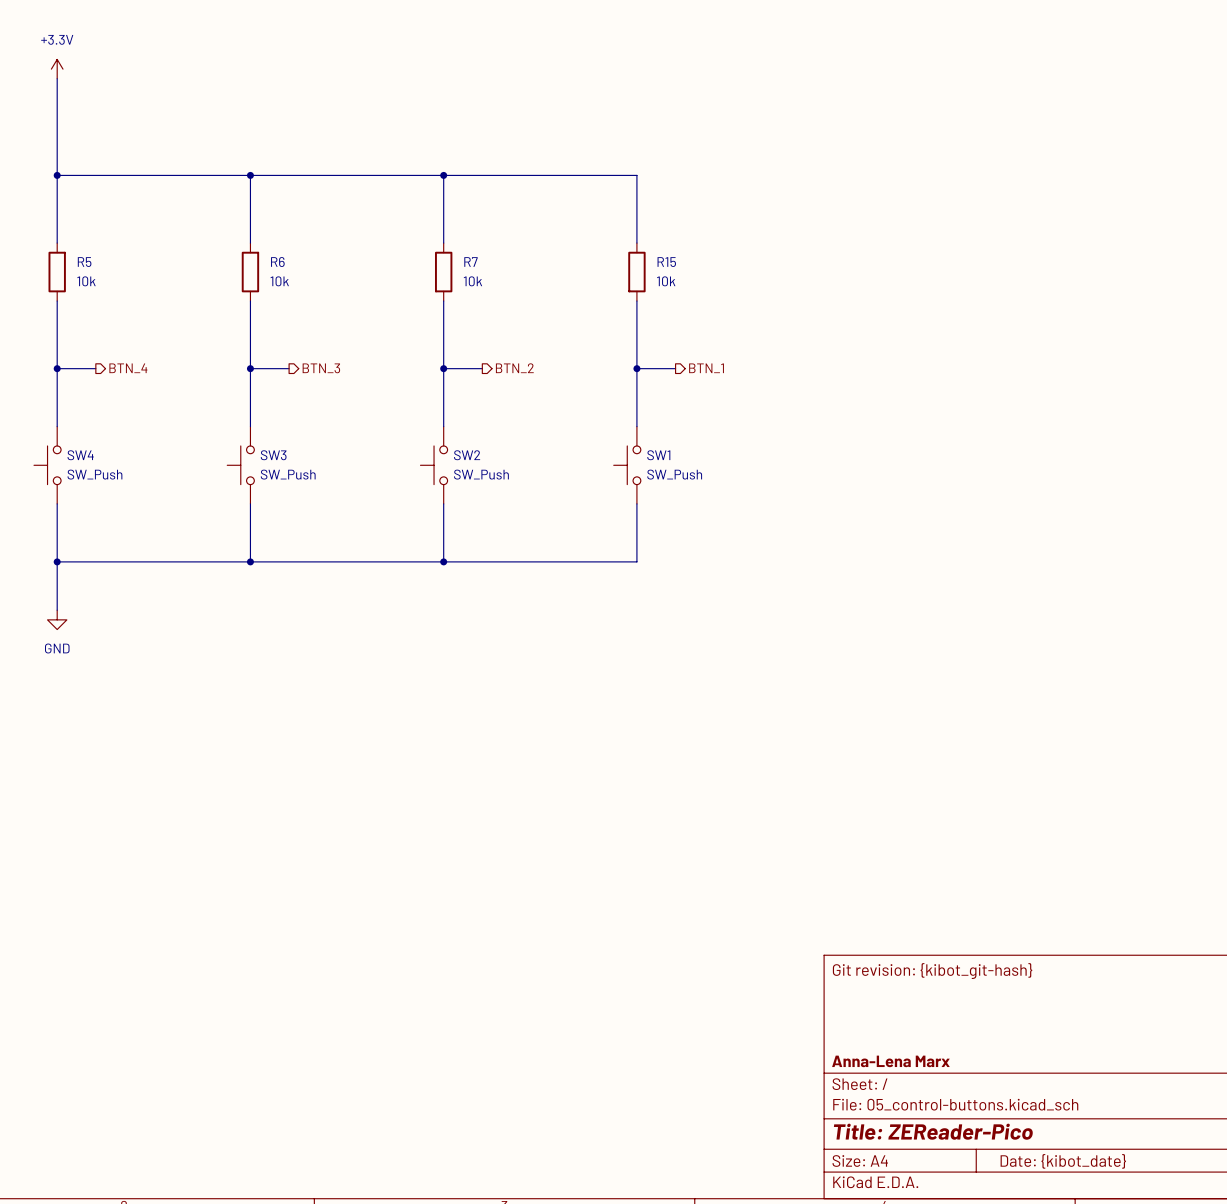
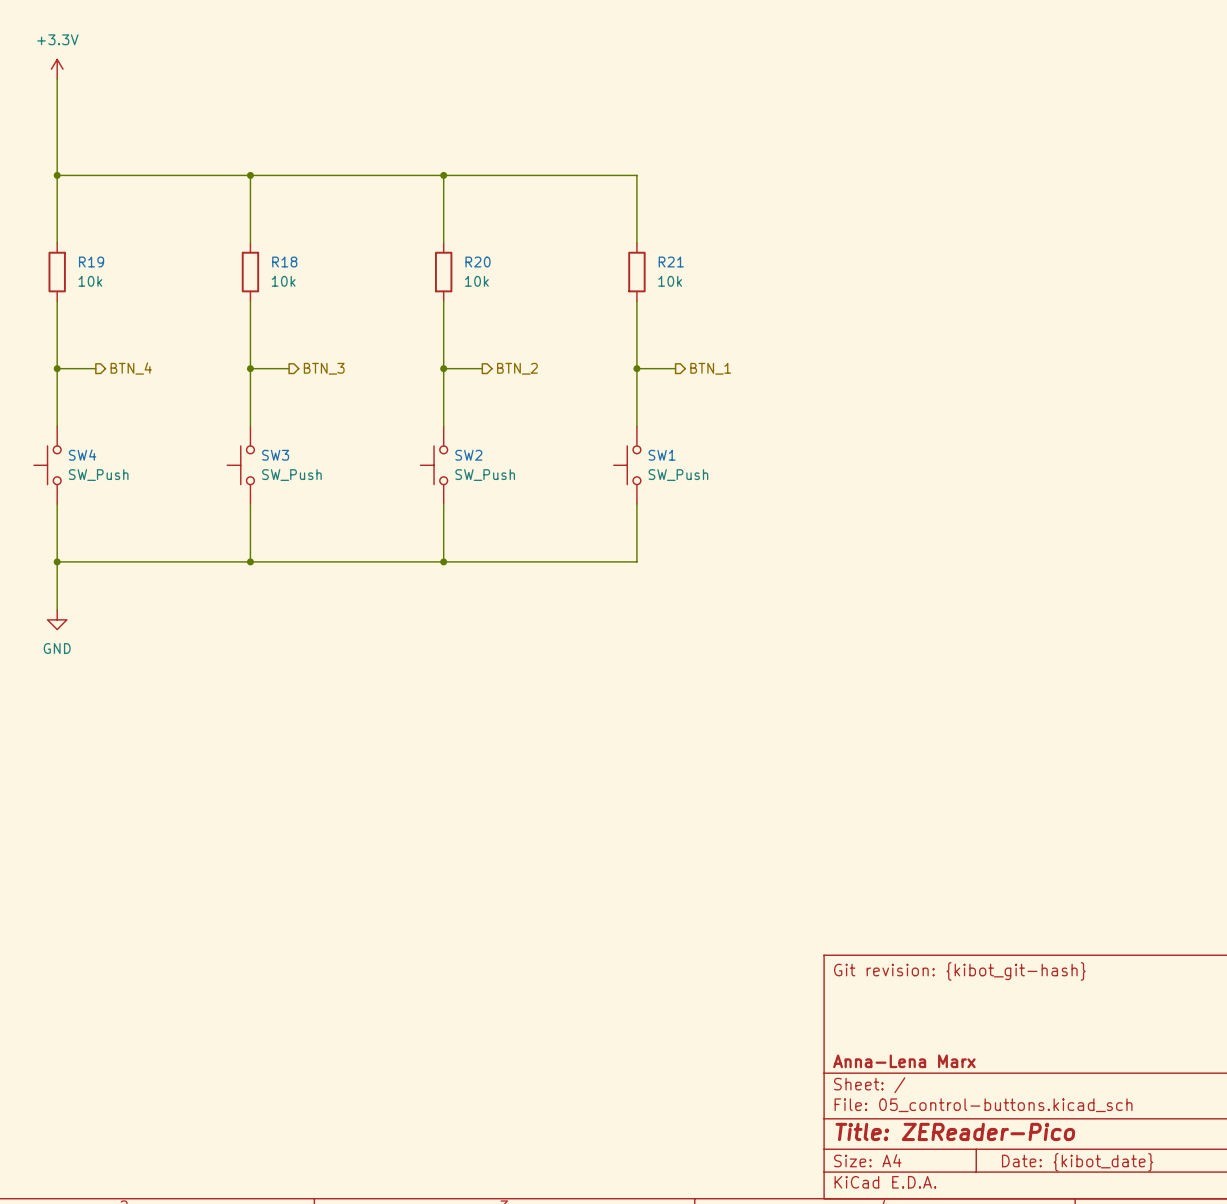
R5 name: R5 (84, 262) -> R19 (91, 262)
R6 name: R6 (277, 262) -> R18 (284, 262)
R7 name: R7 (471, 262) -> R20 (478, 262)
R15 name: R15 (666, 262) -> R21 (671, 262)

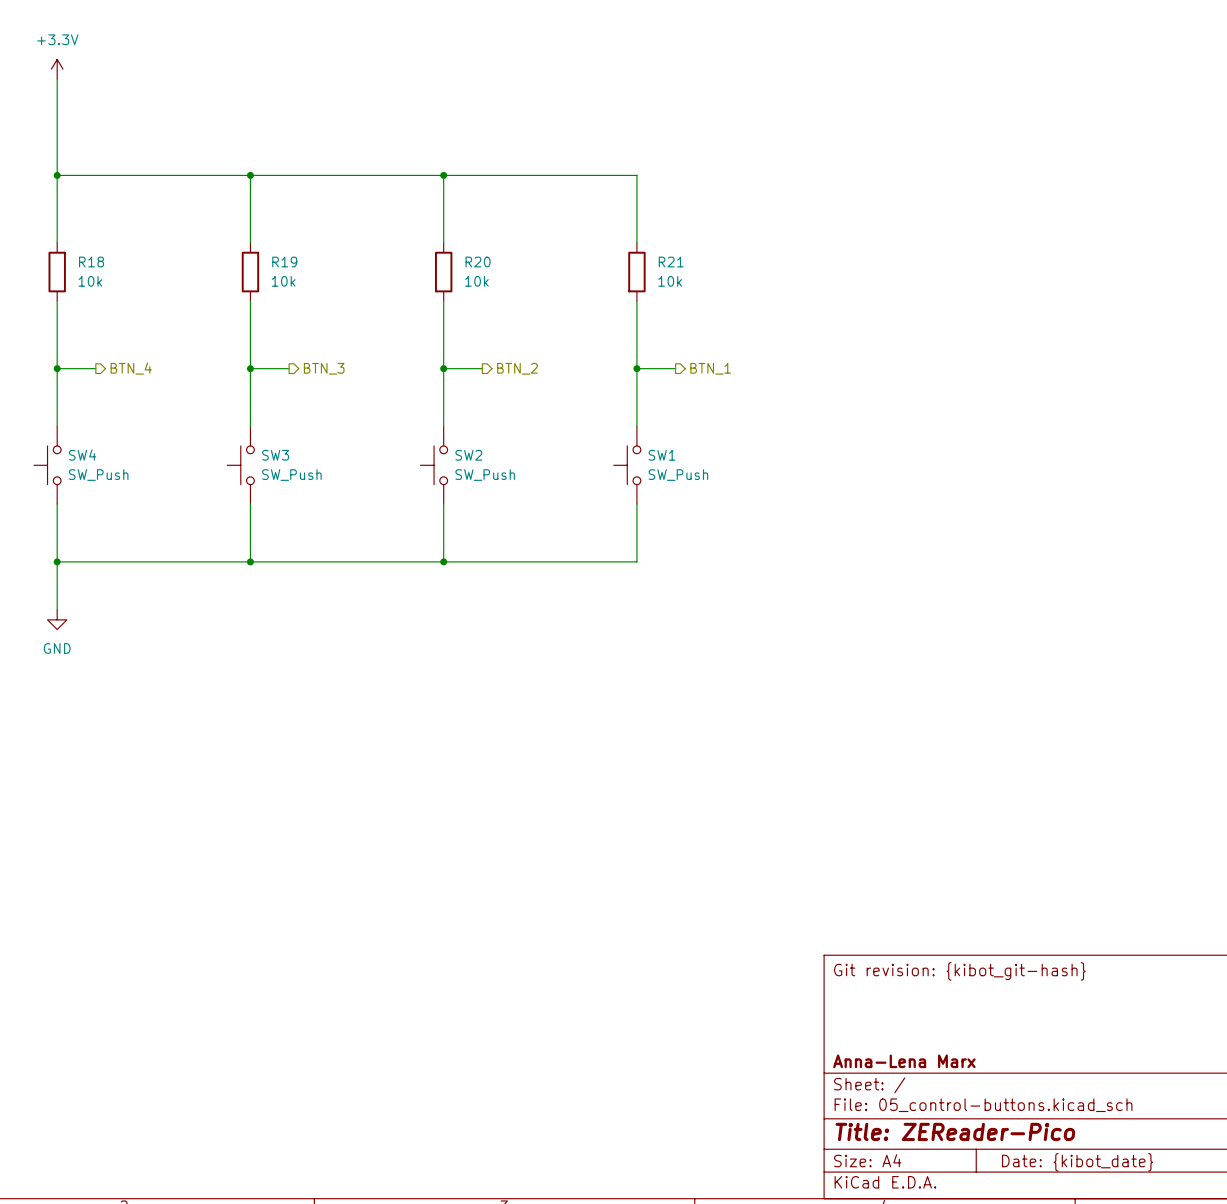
R19 name: R19 (91, 262) -> R18 (91, 262)
R18 name: R18 (284, 262) -> R19 (284, 262)

